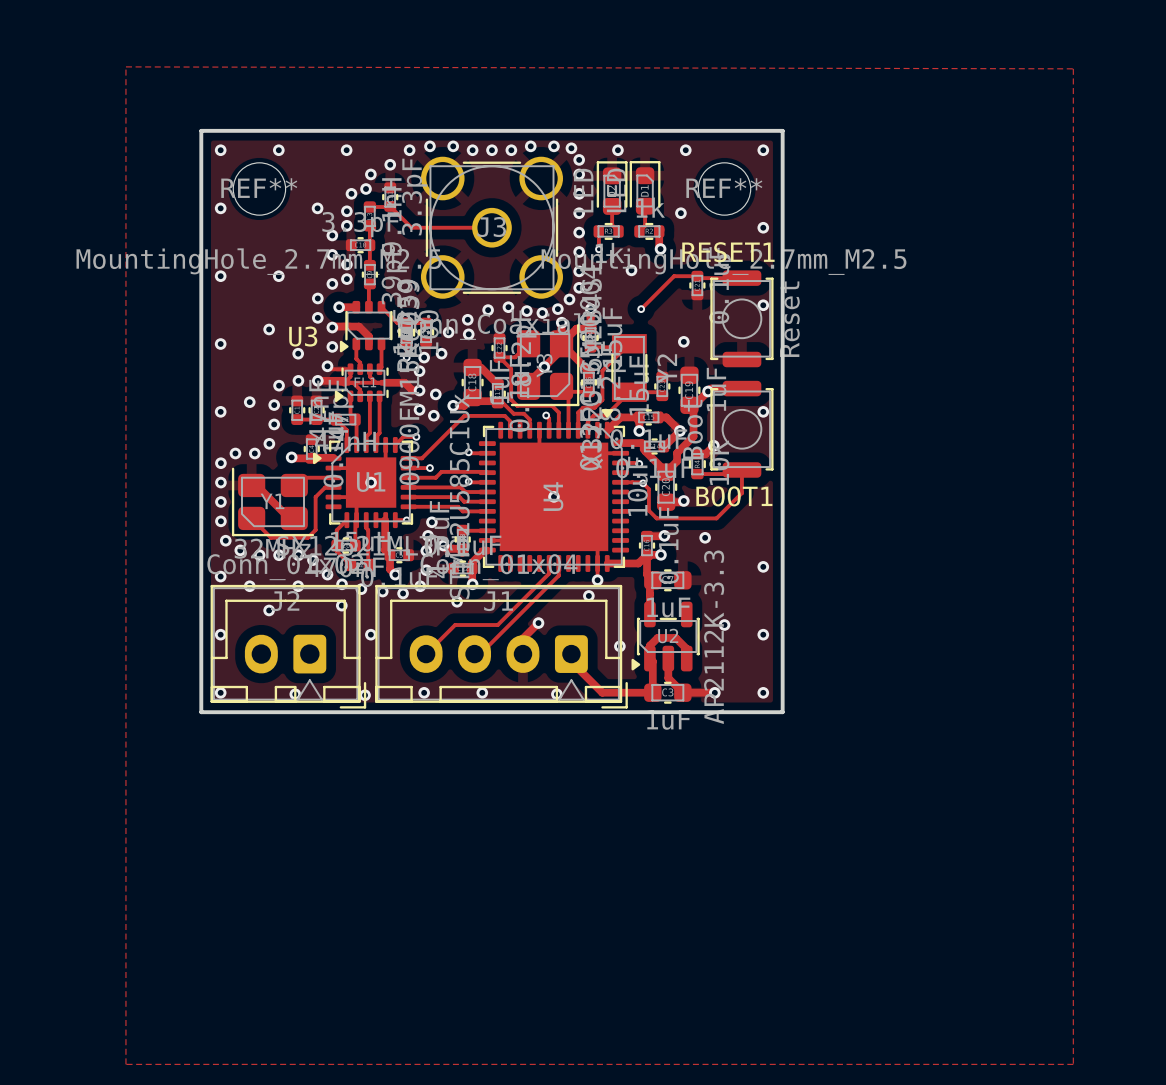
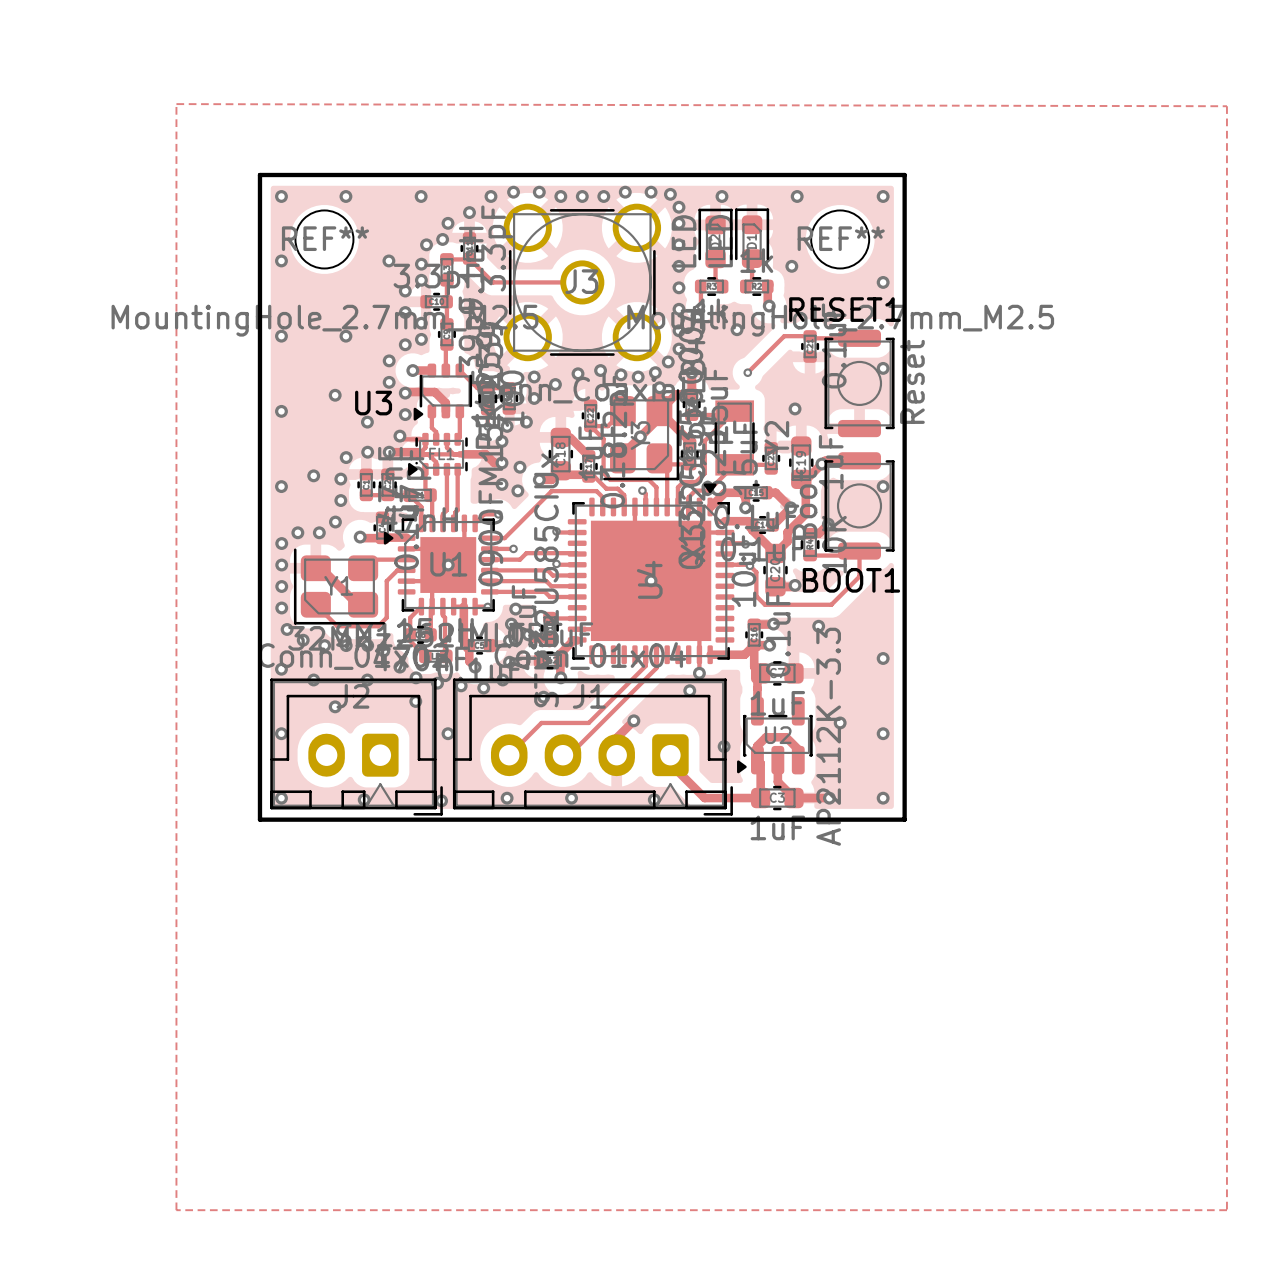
via position: (468, 334) -> (534, 376)

